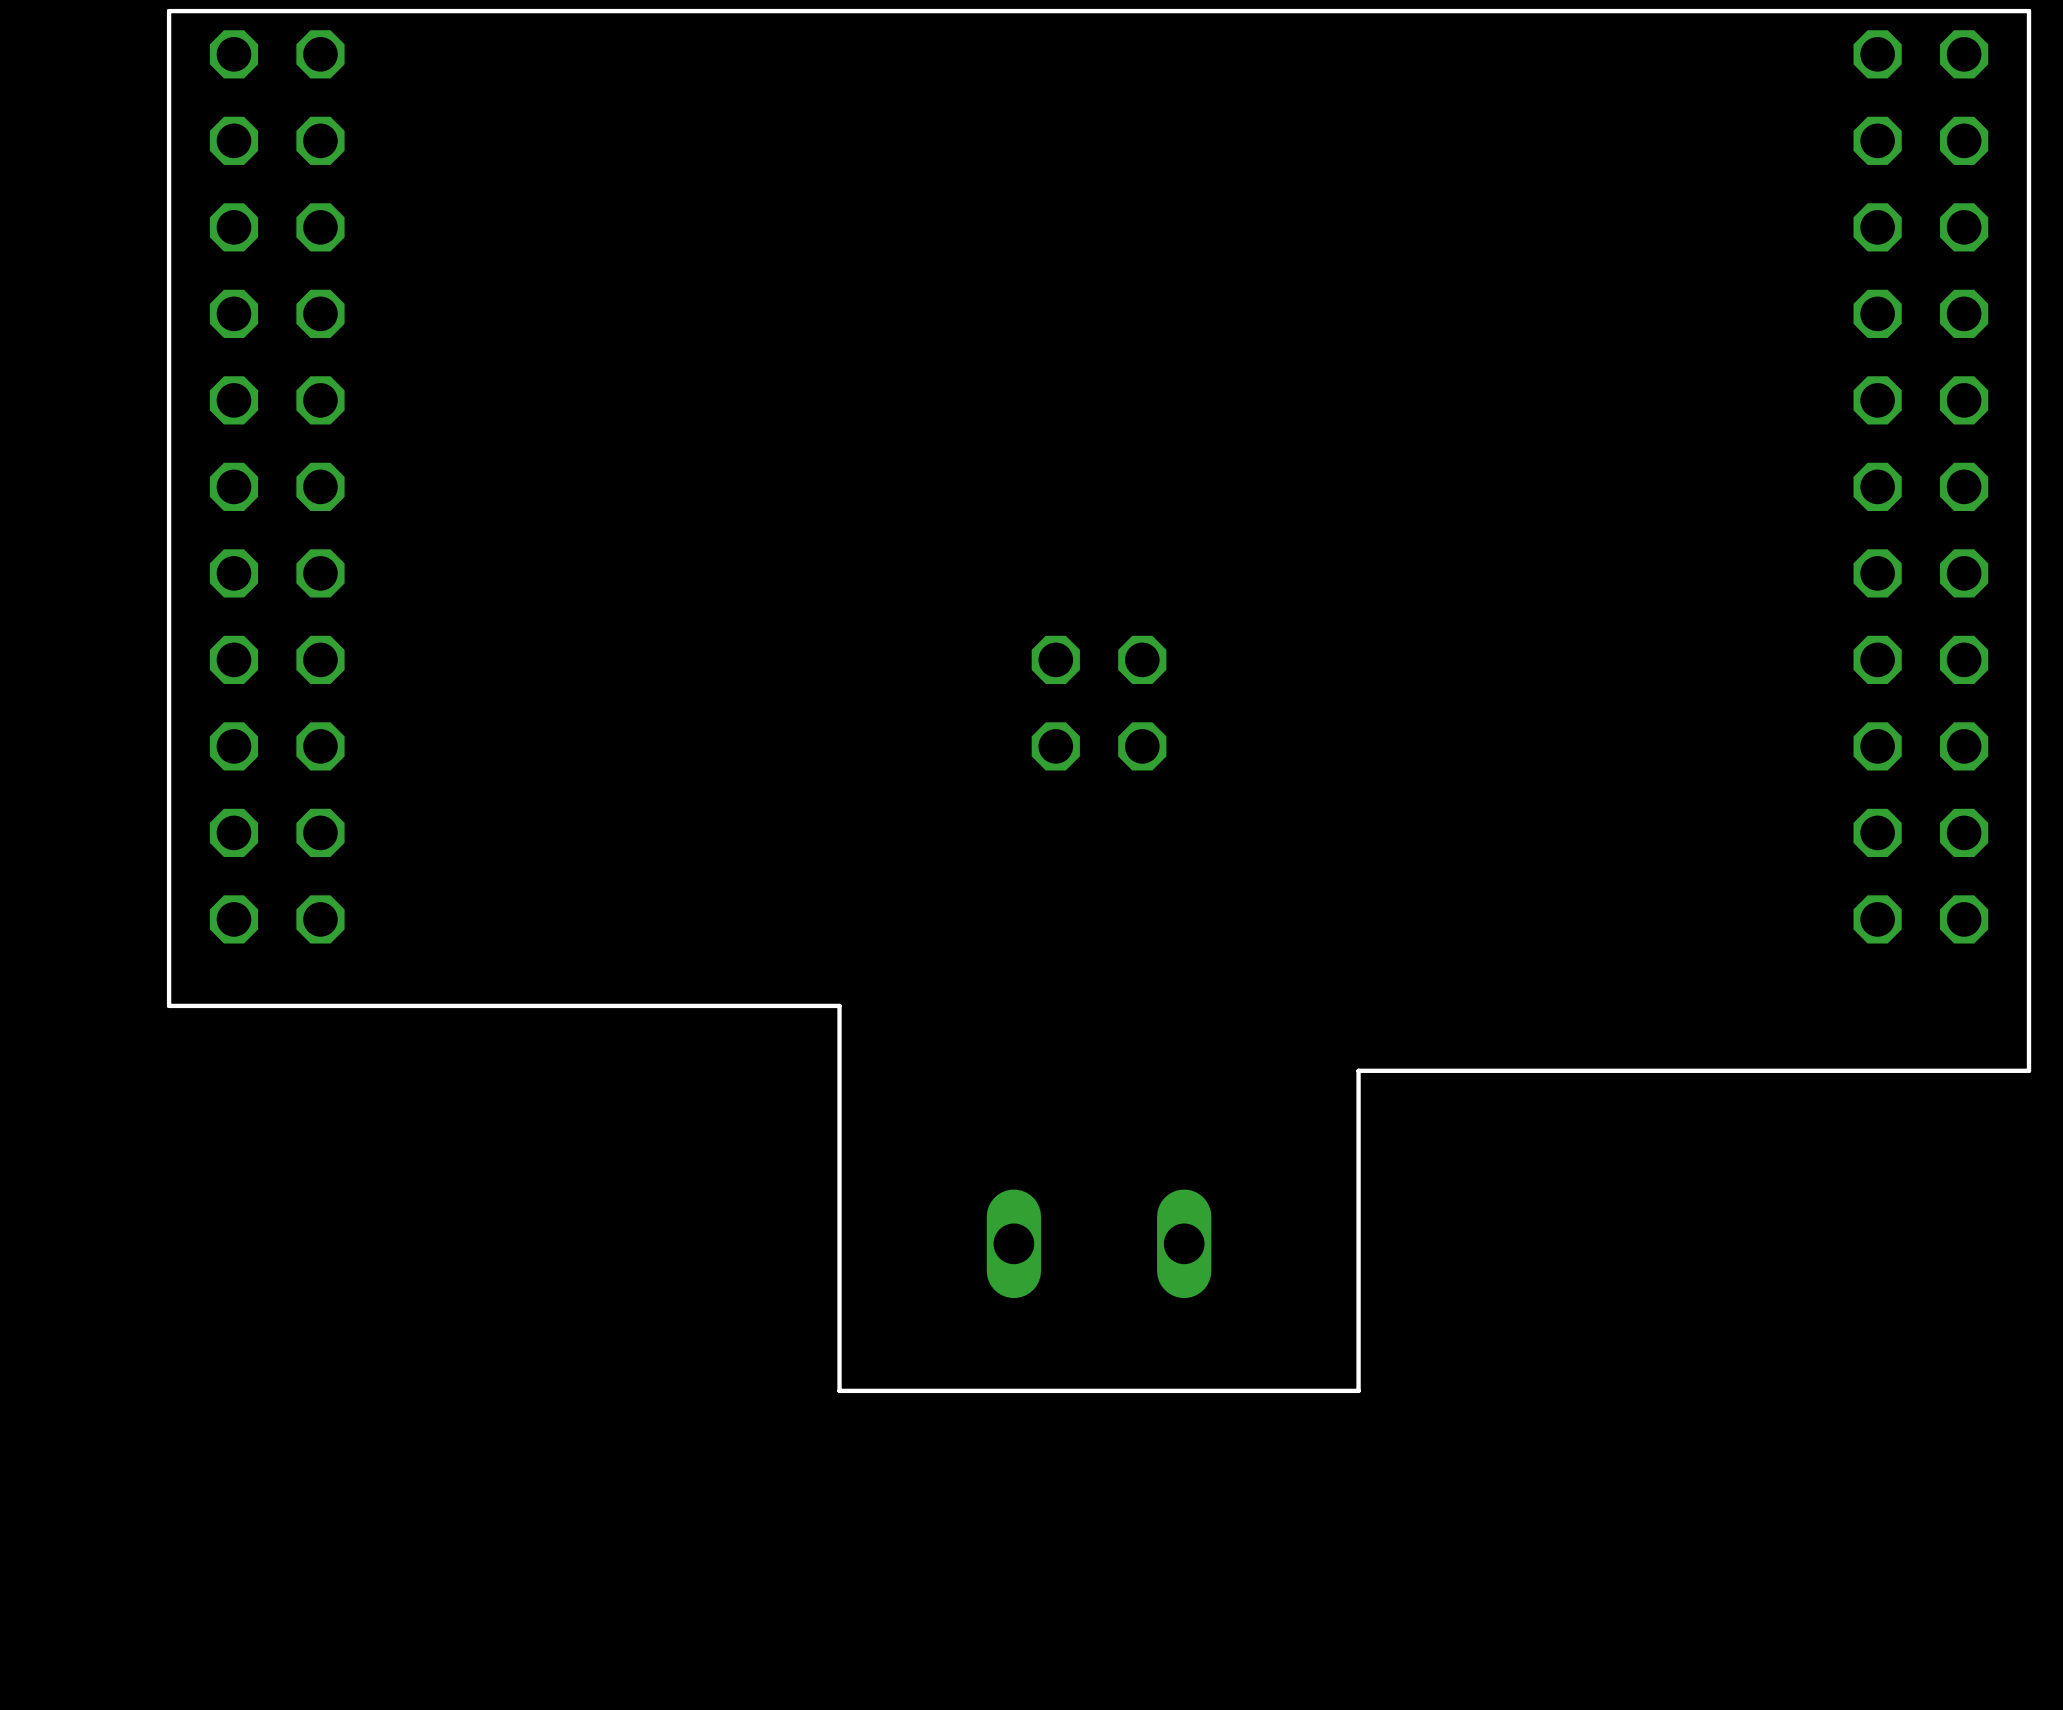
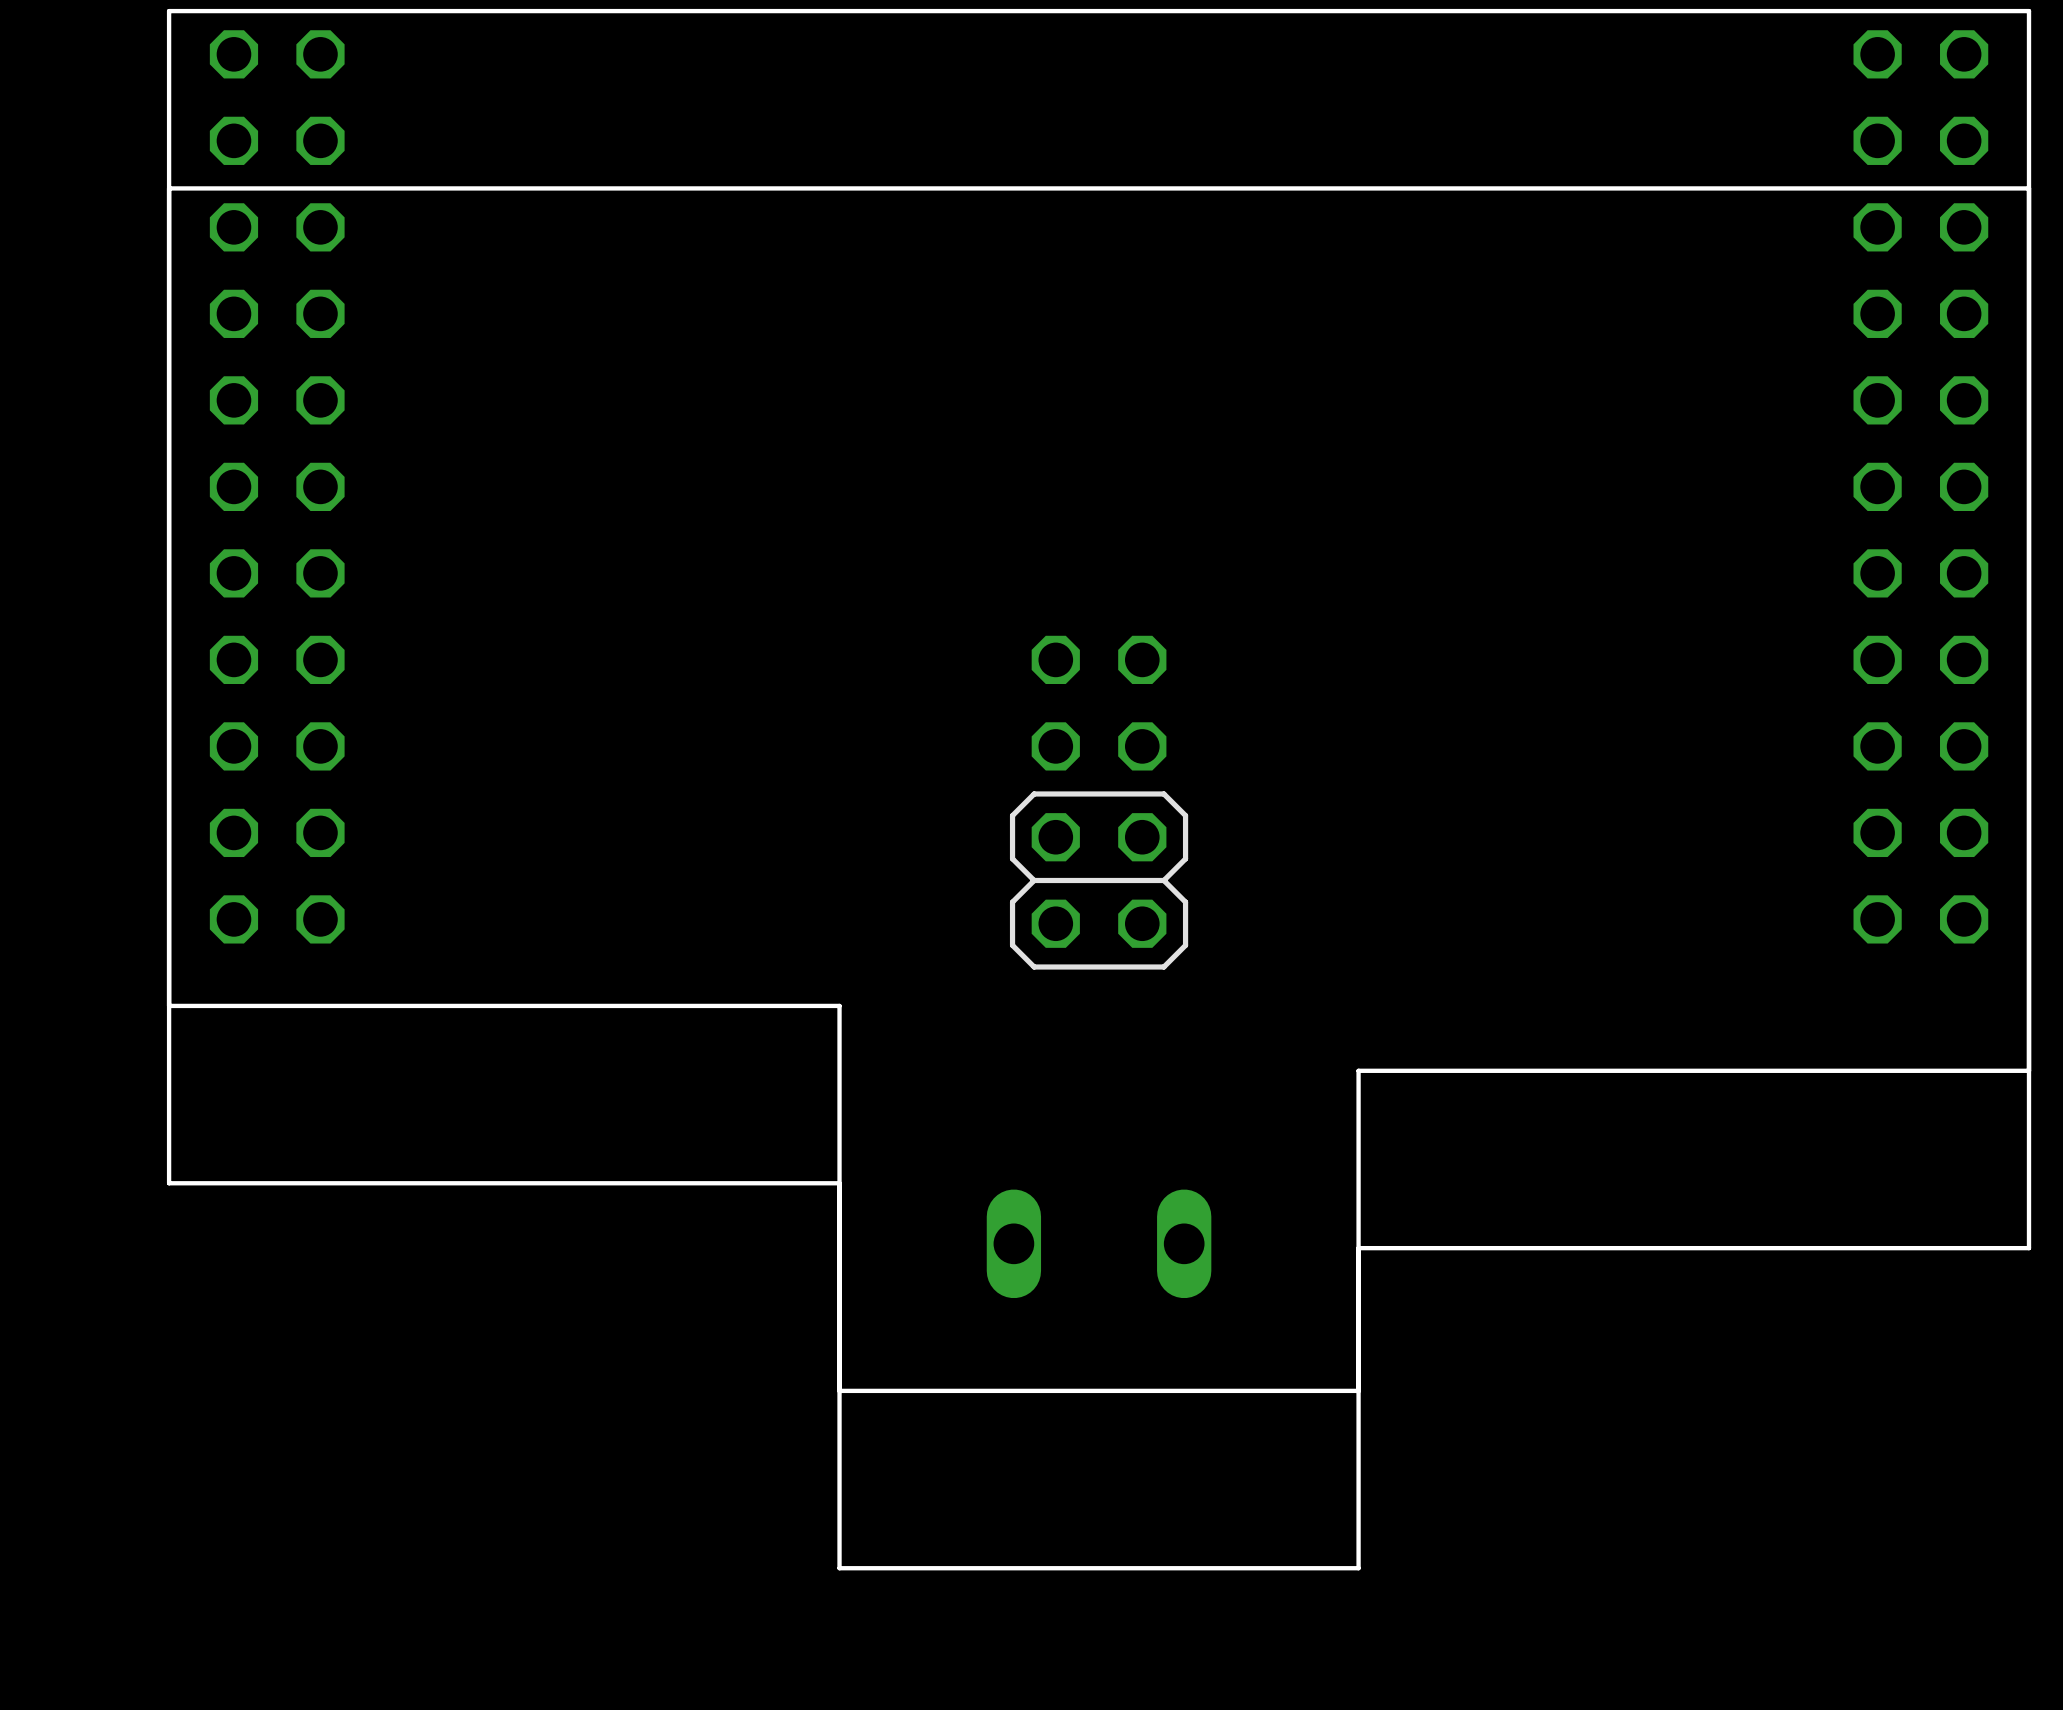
drawing: none -> [166, 186, 2032, 1571]
part: none -> (1099, 880)

